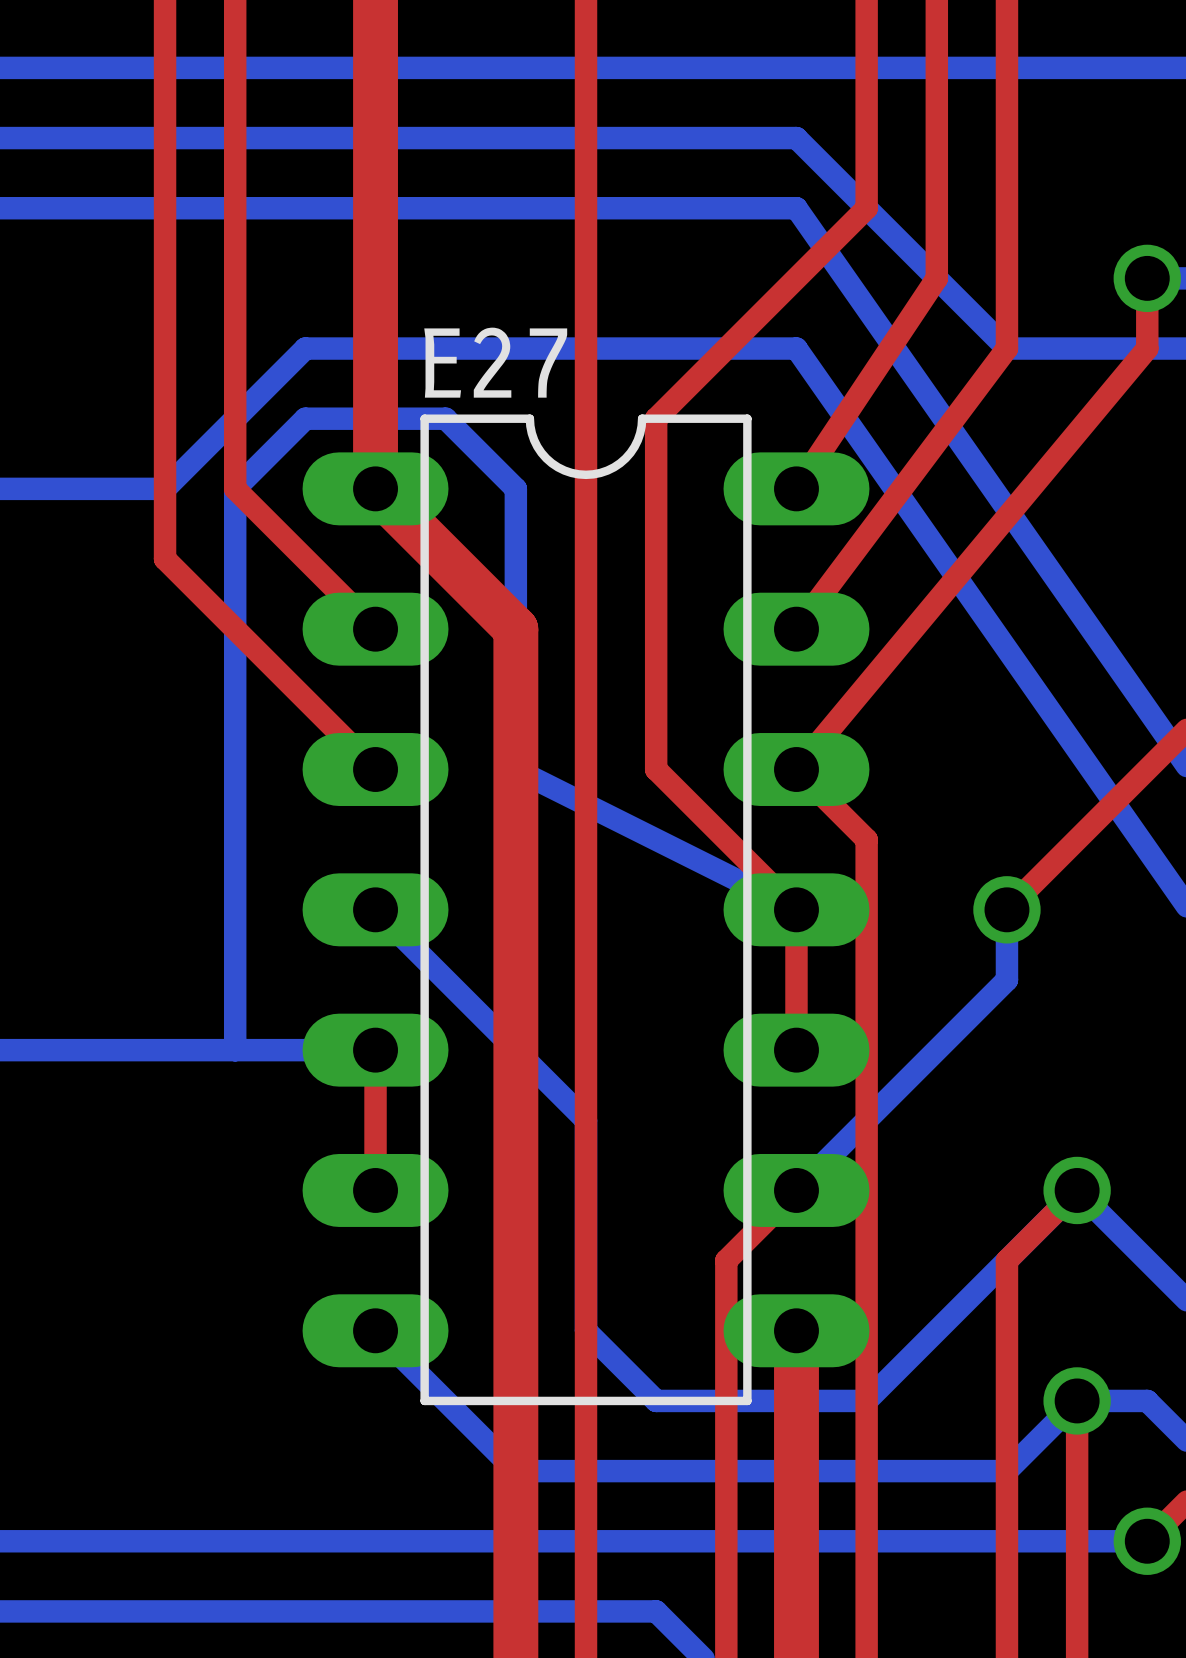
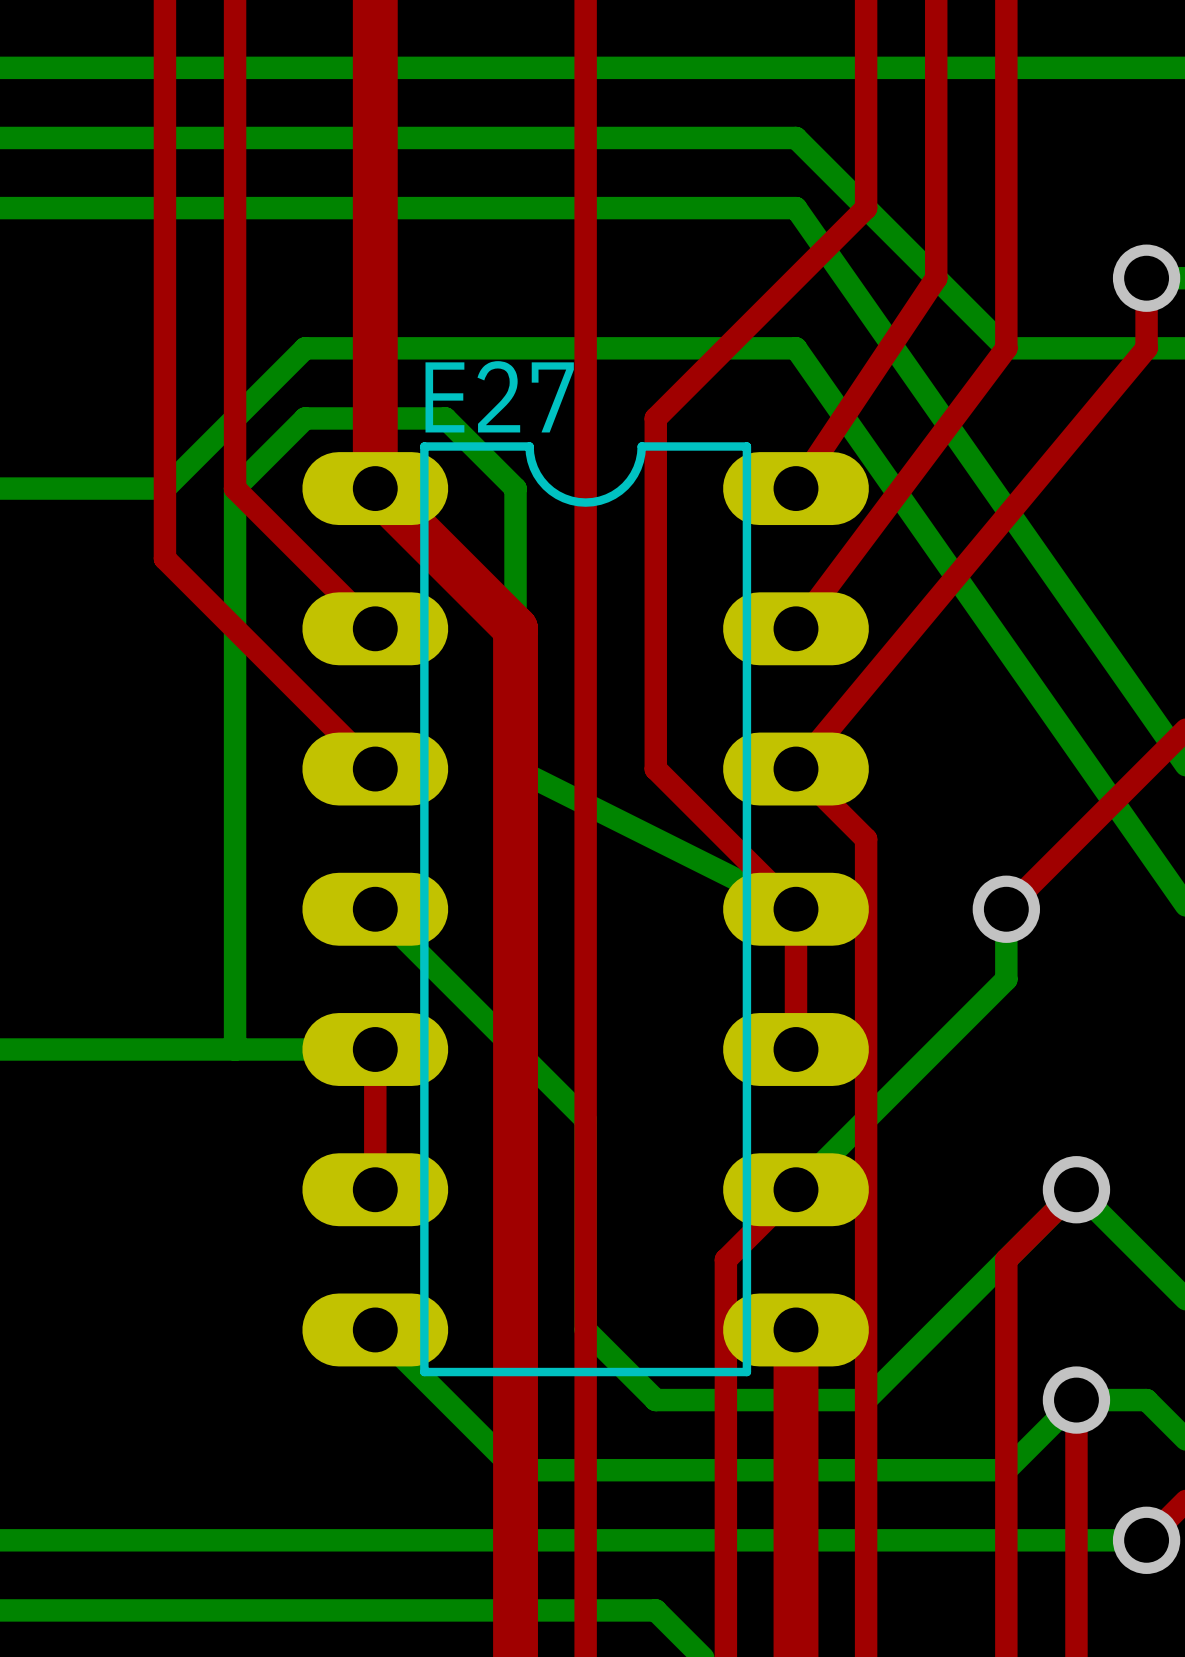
E27 name position: E27 (495, 362) -> E27 (499, 396)
E27 footprint: [302, 414, 870, 1406] -> [302, 442, 869, 1377]

